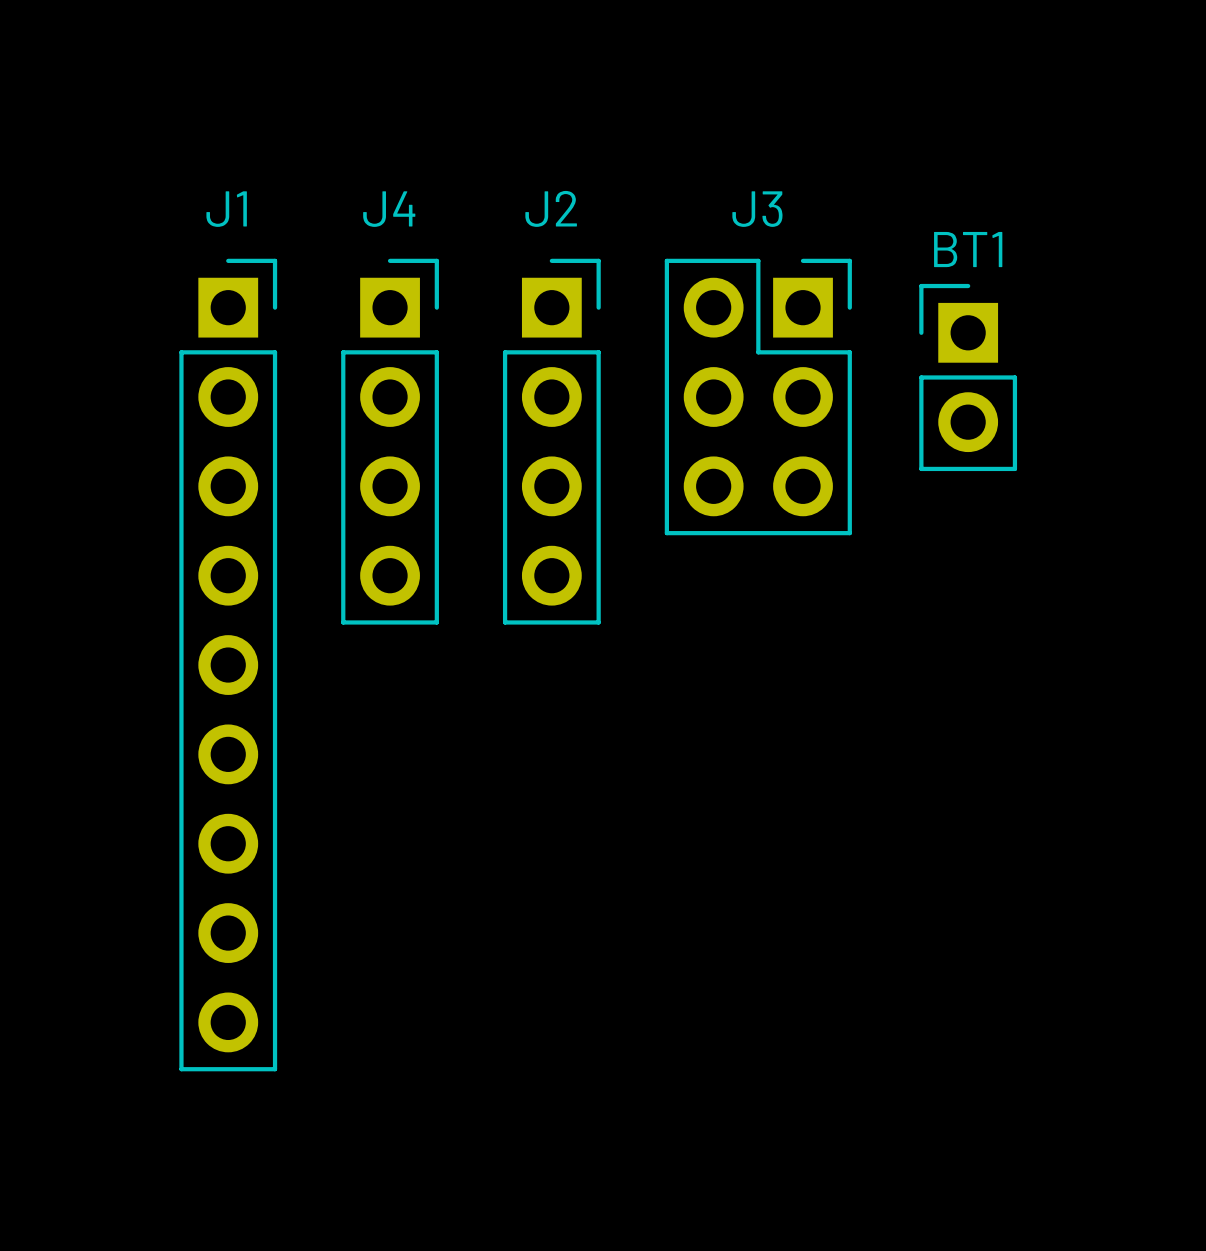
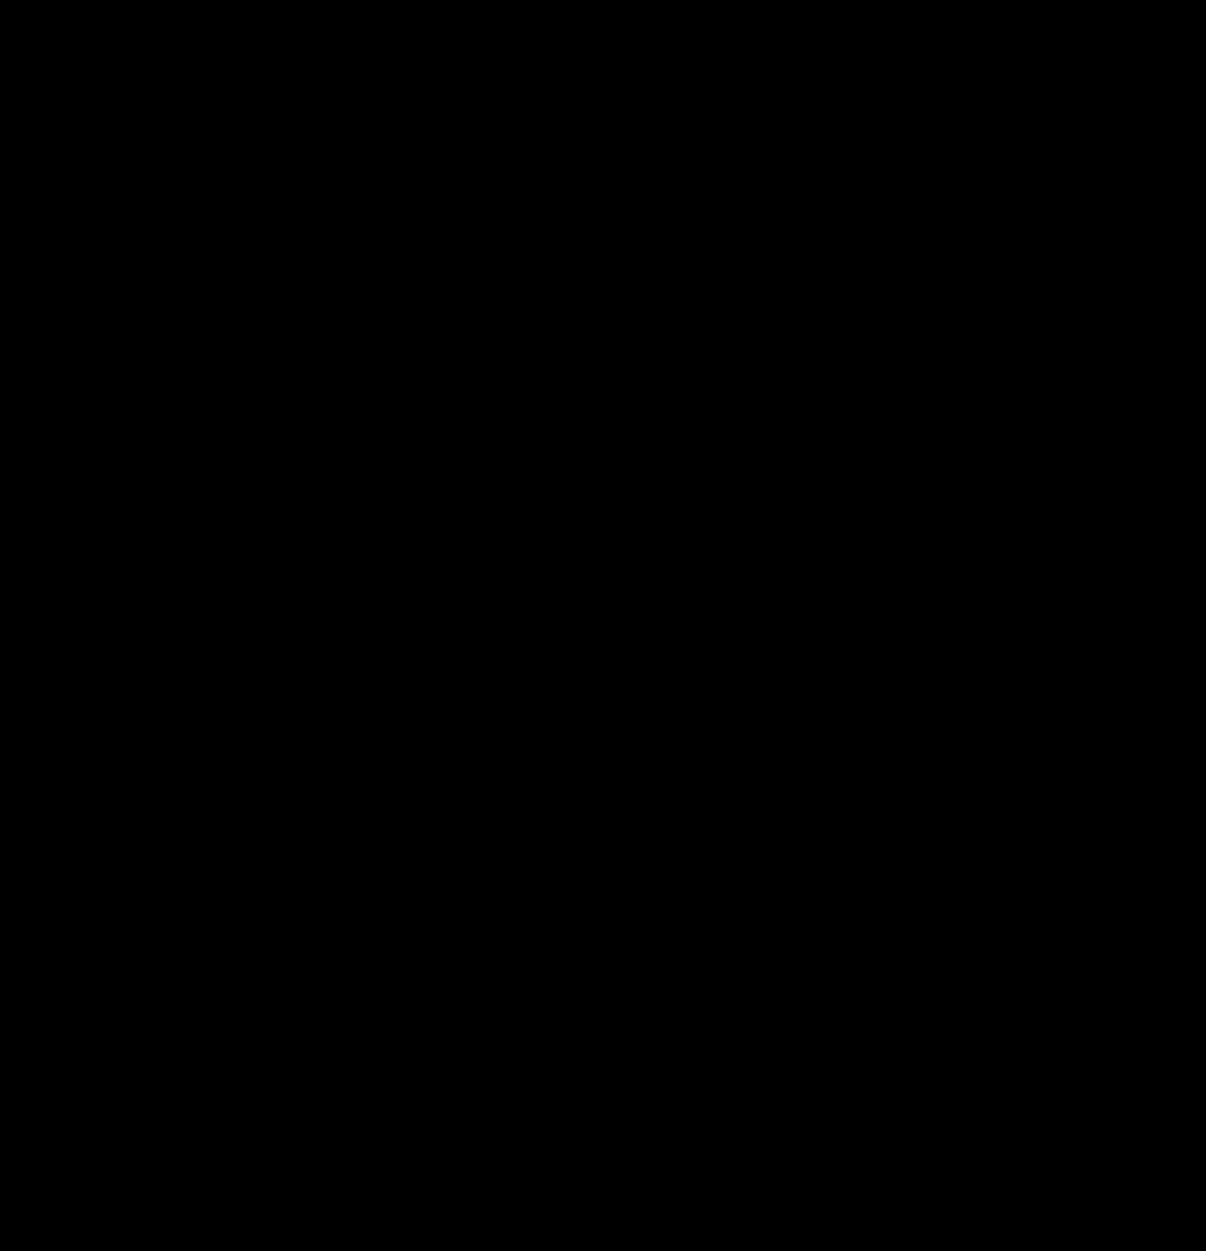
BT1: (968, 377) -> none
J3: (758, 397) -> none
J4: (390, 441) -> none
J2: (551, 441) -> none
J1: (228, 665) -> none

